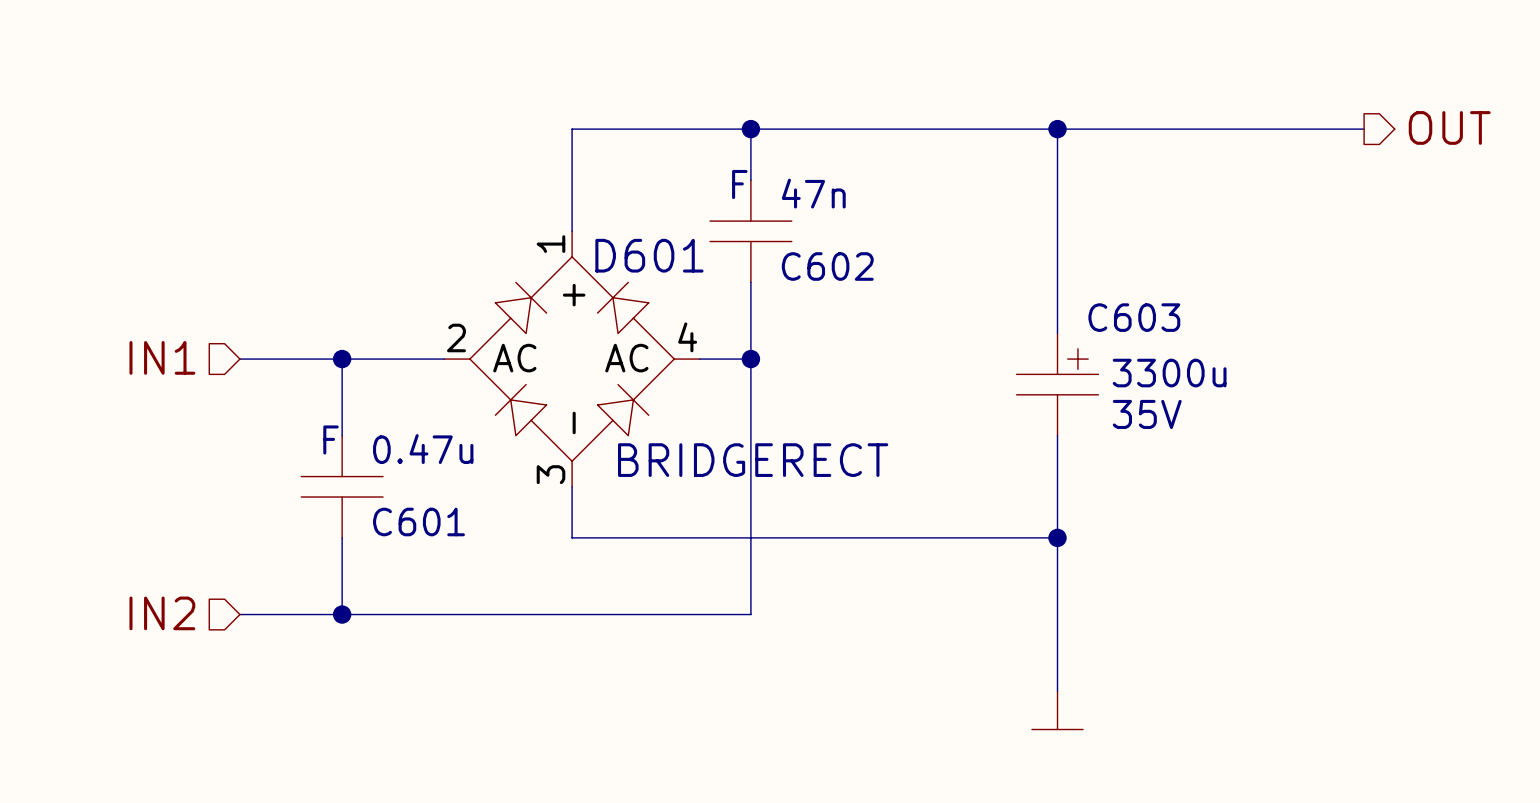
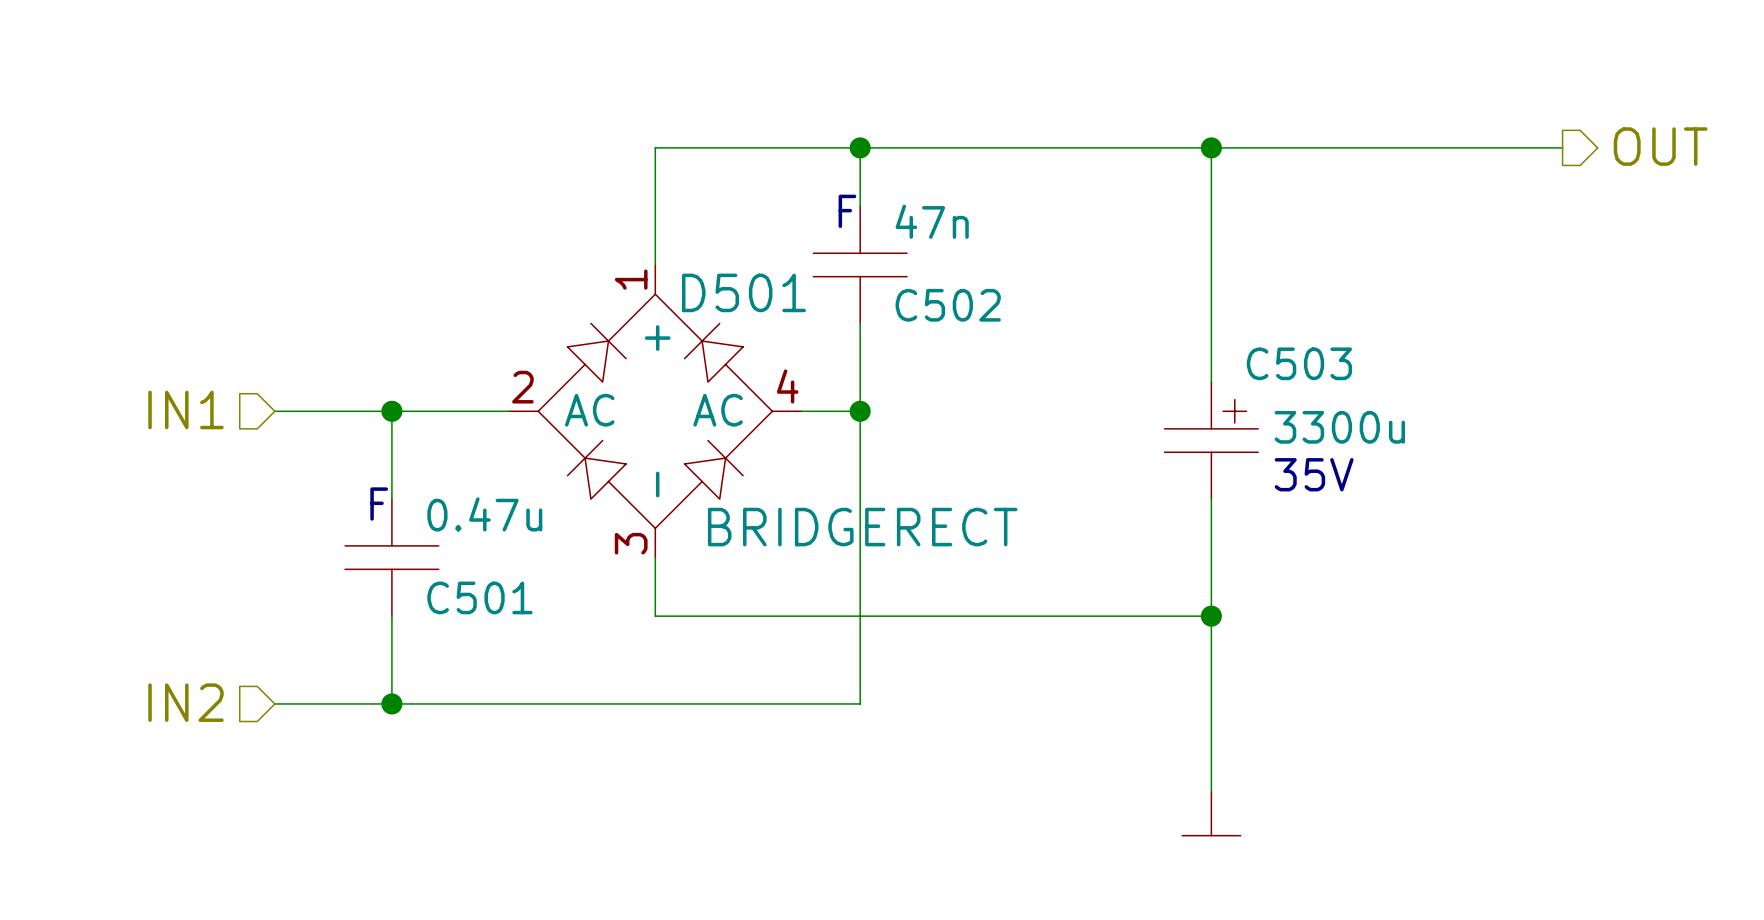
D601 name: D601 (649, 255) -> D501 (743, 292)
C602 name: C602 (827, 266) -> C502 (948, 305)
C603 name: C603 (1134, 317) -> C503 (1299, 363)
C601 name: C601 (418, 521) -> C501 (479, 597)

